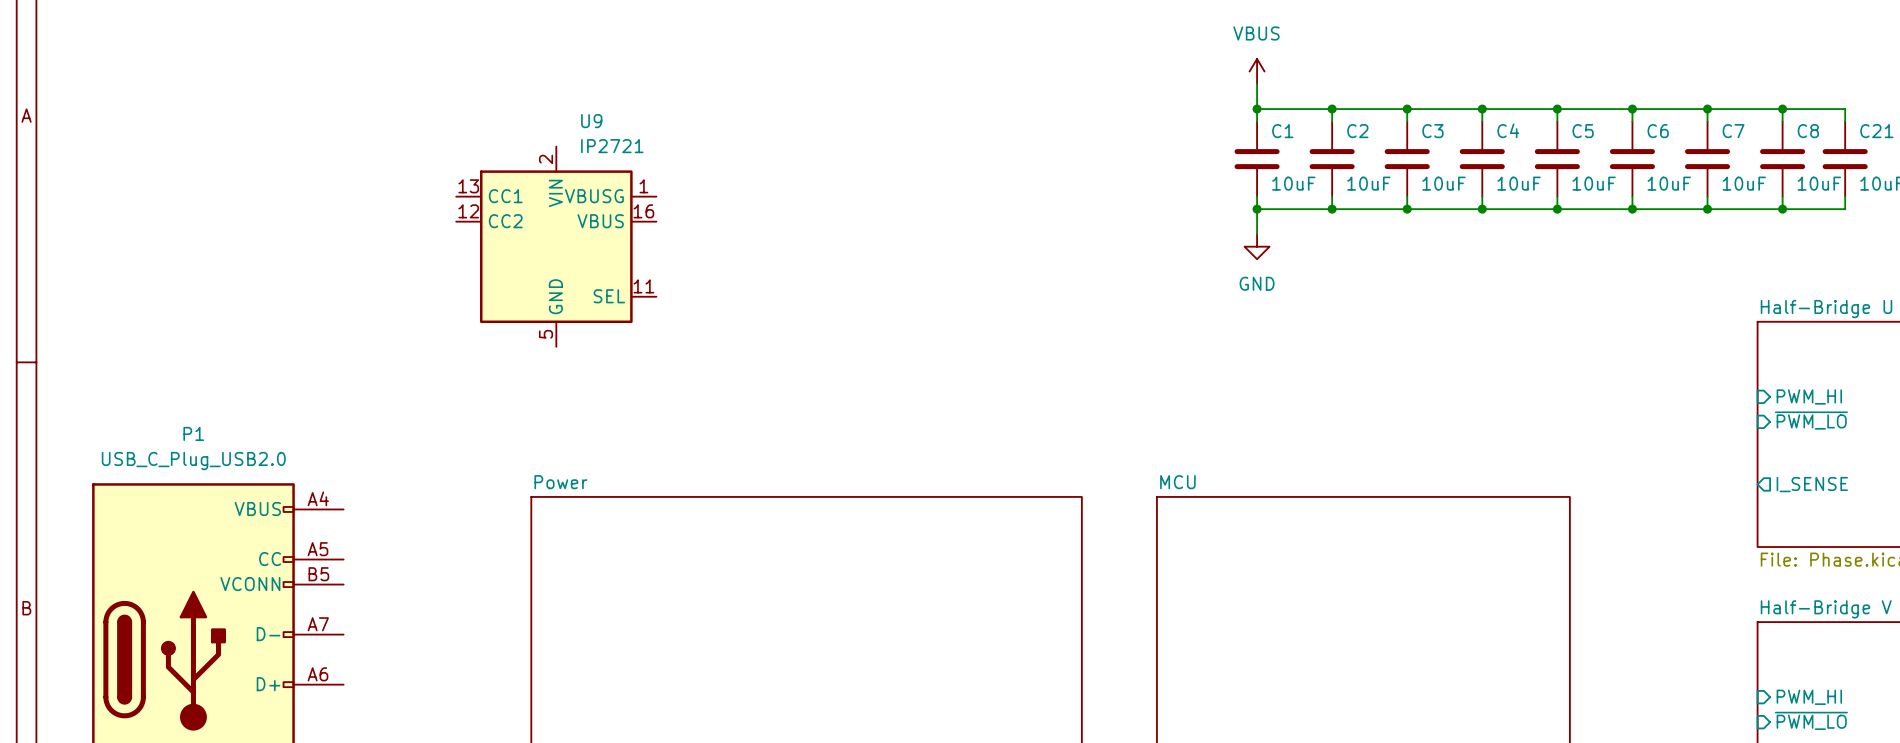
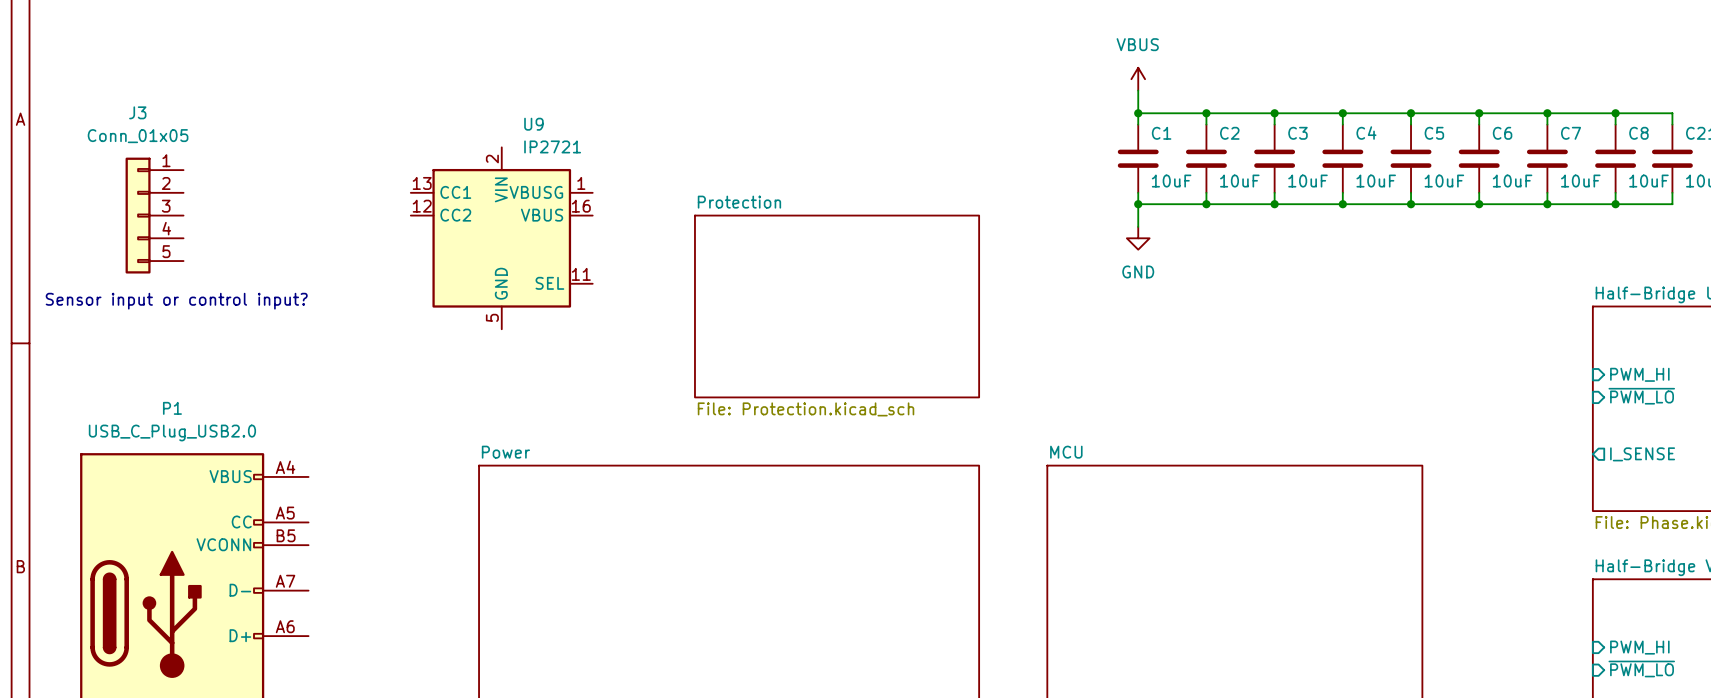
J3: none -> Conn_01x05 (154, 215)
text: none -> Sensor input or control input? (176, 301)
sheet Protection: none -> File: Protection.kicad_sch (837, 306)

